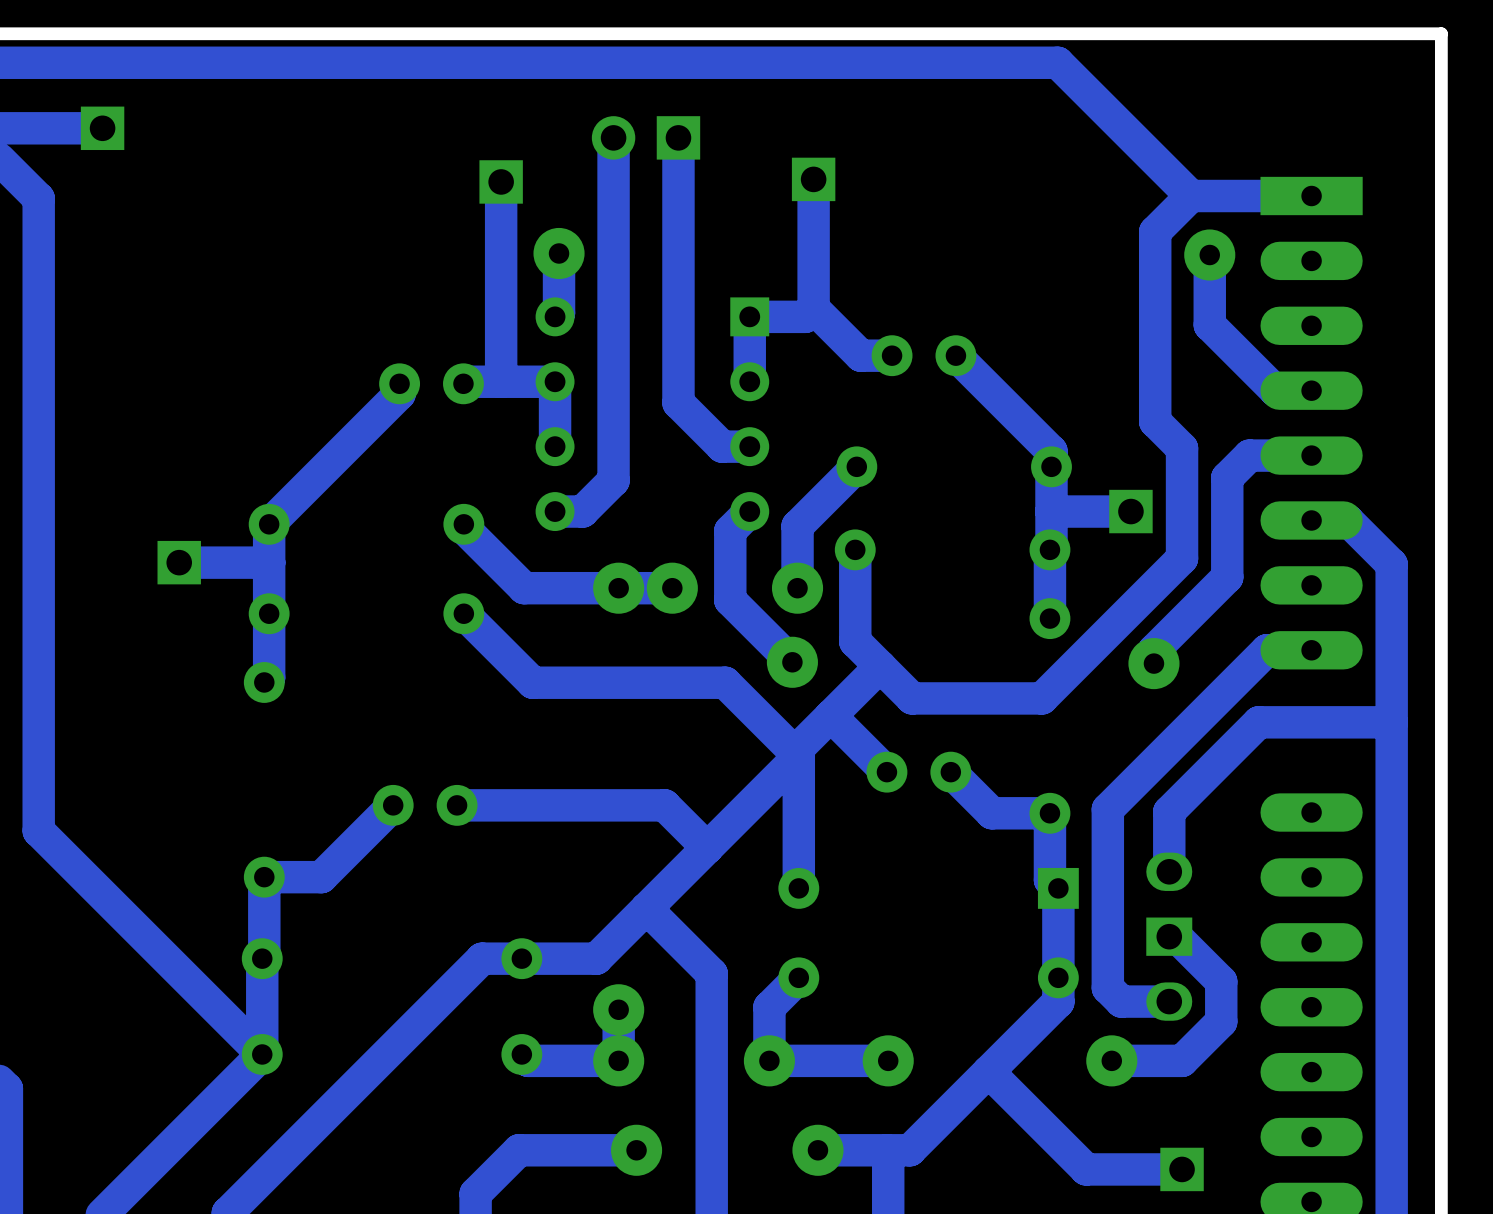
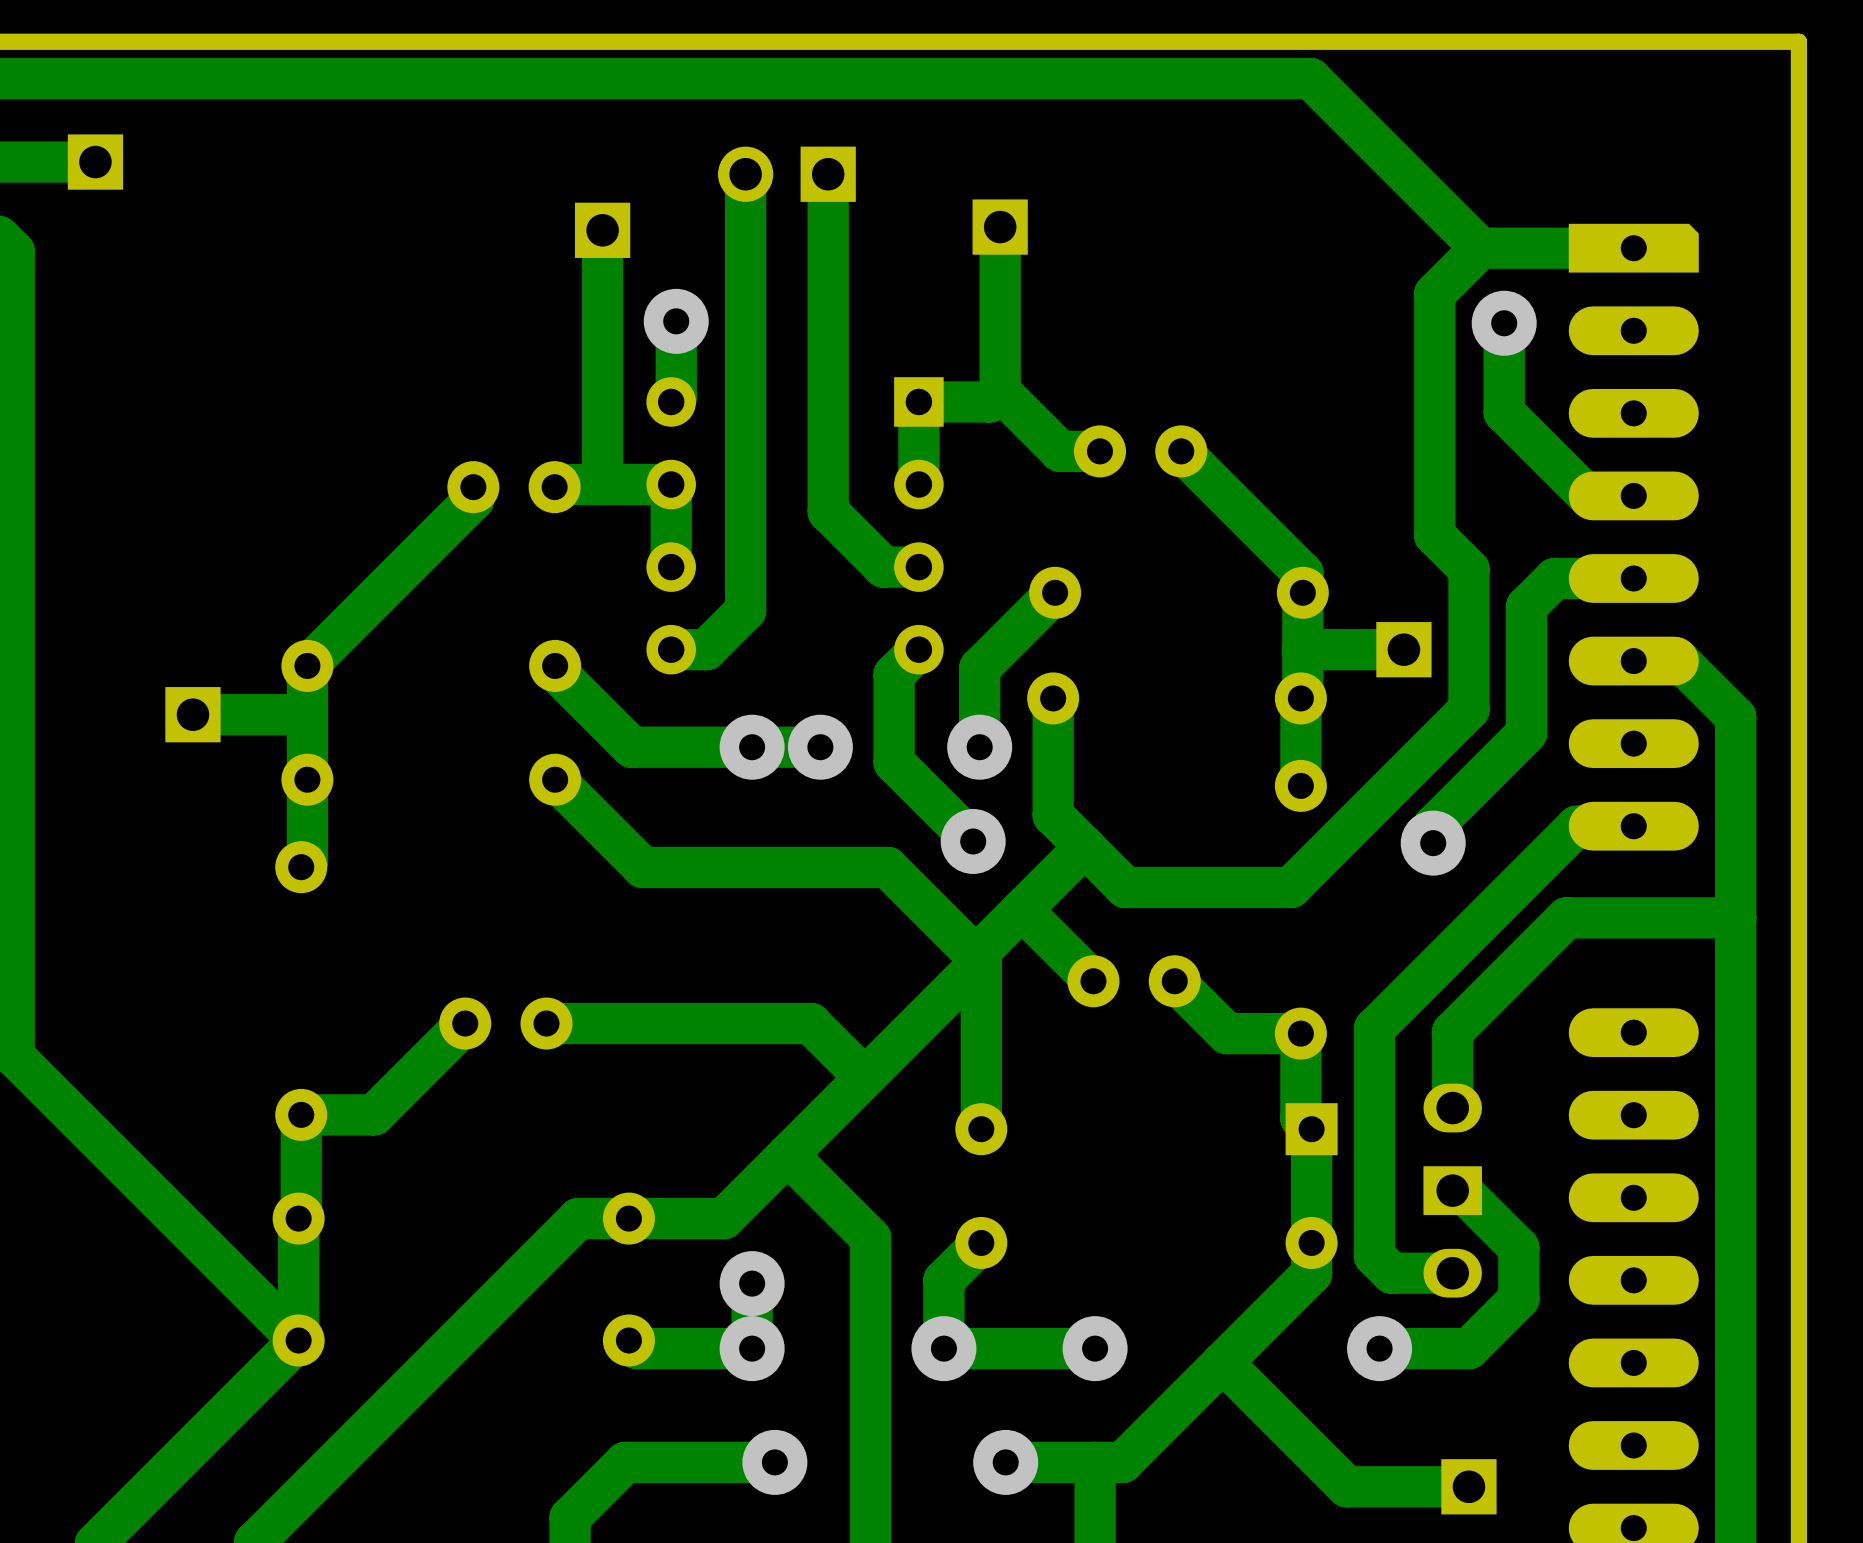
part footprint: [1260, 176, 1363, 670] -> [1568, 223, 1699, 851]

